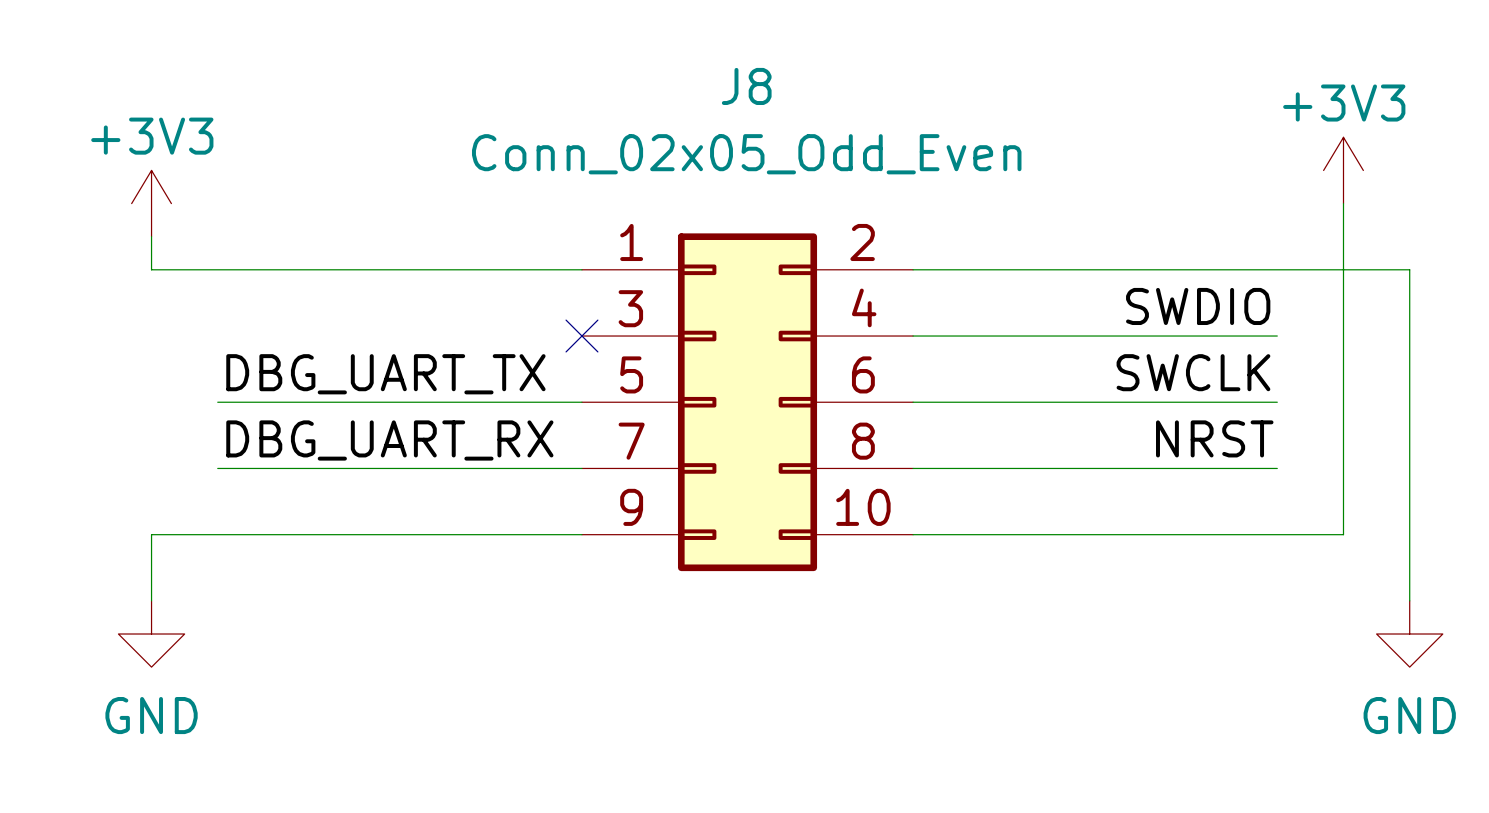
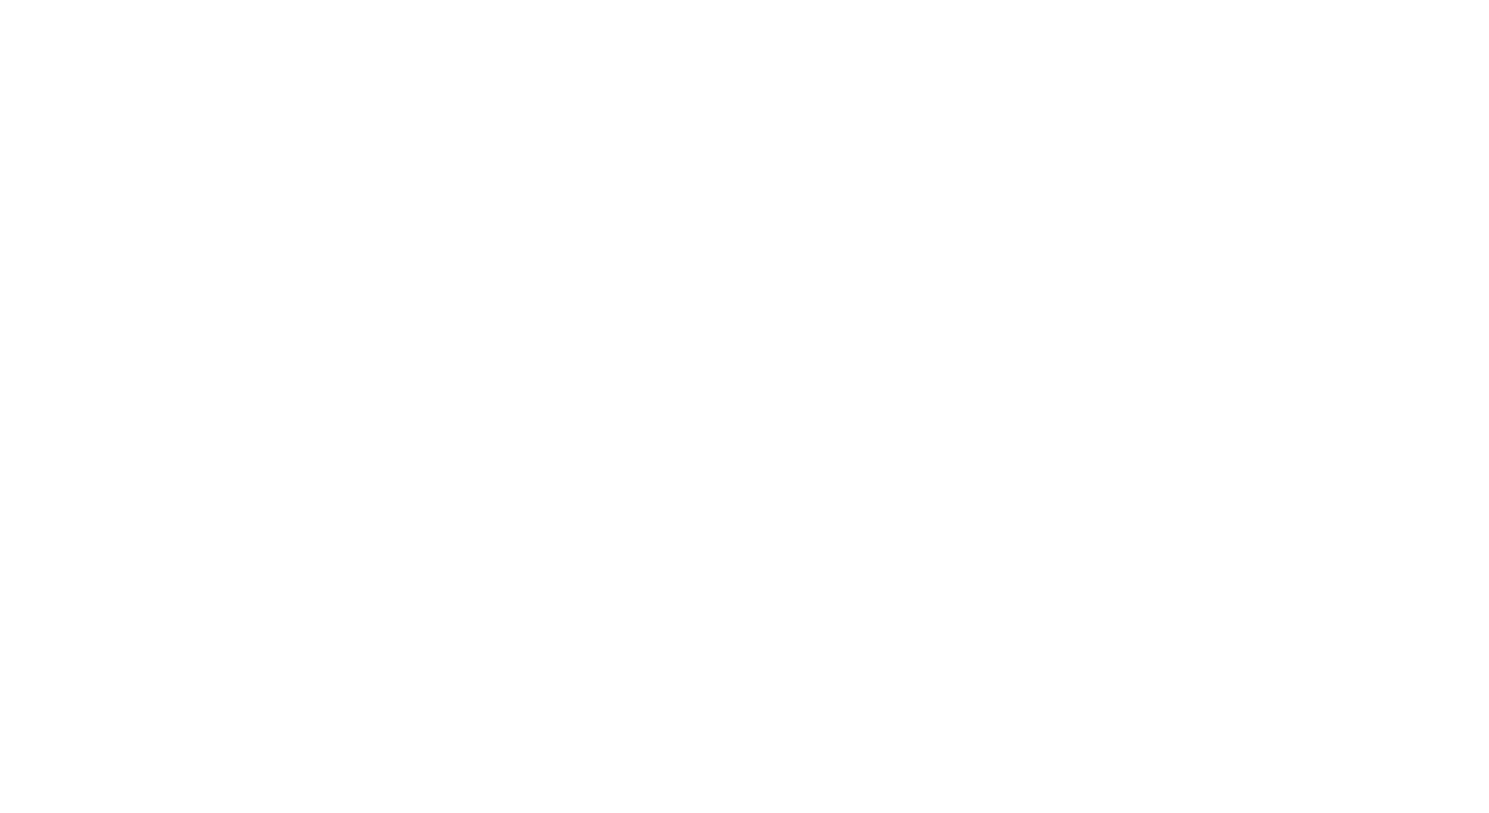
power symbol: +3V3 (1343, 170) -> none
power symbol: +3V3 (151, 203) -> none
wire: (1343, 203) (1343, 534) (913, 534) -> none
wire: (151, 236) (151, 269) (581, 269) -> none
wire: (913, 269) (1409, 269) (1409, 600) -> none
label: SWDIO (1198, 306) -> none
no-connect mark: (581, 336) -> none
wire: (913, 336) (1277, 336) -> none
label: SWCLK (1193, 372) -> none
label: DBG_UART_TX (385, 374) -> none
wire: (217, 402) (581, 402) -> none
J8: Conn_02x05_Odd_Even (747, 402) -> none
wire: (913, 402) (1277, 402) -> none
label: NRST (1214, 438) -> none
label: DBG_UART_RX (389, 440) -> none
wire: (217, 468) (581, 468) -> none
wire: (913, 468) (1277, 468) -> none
wire: (581, 534) (151, 534) (151, 600) -> none
power symbol: GND (151, 634) -> none
power symbol: GND (1409, 634) -> none

